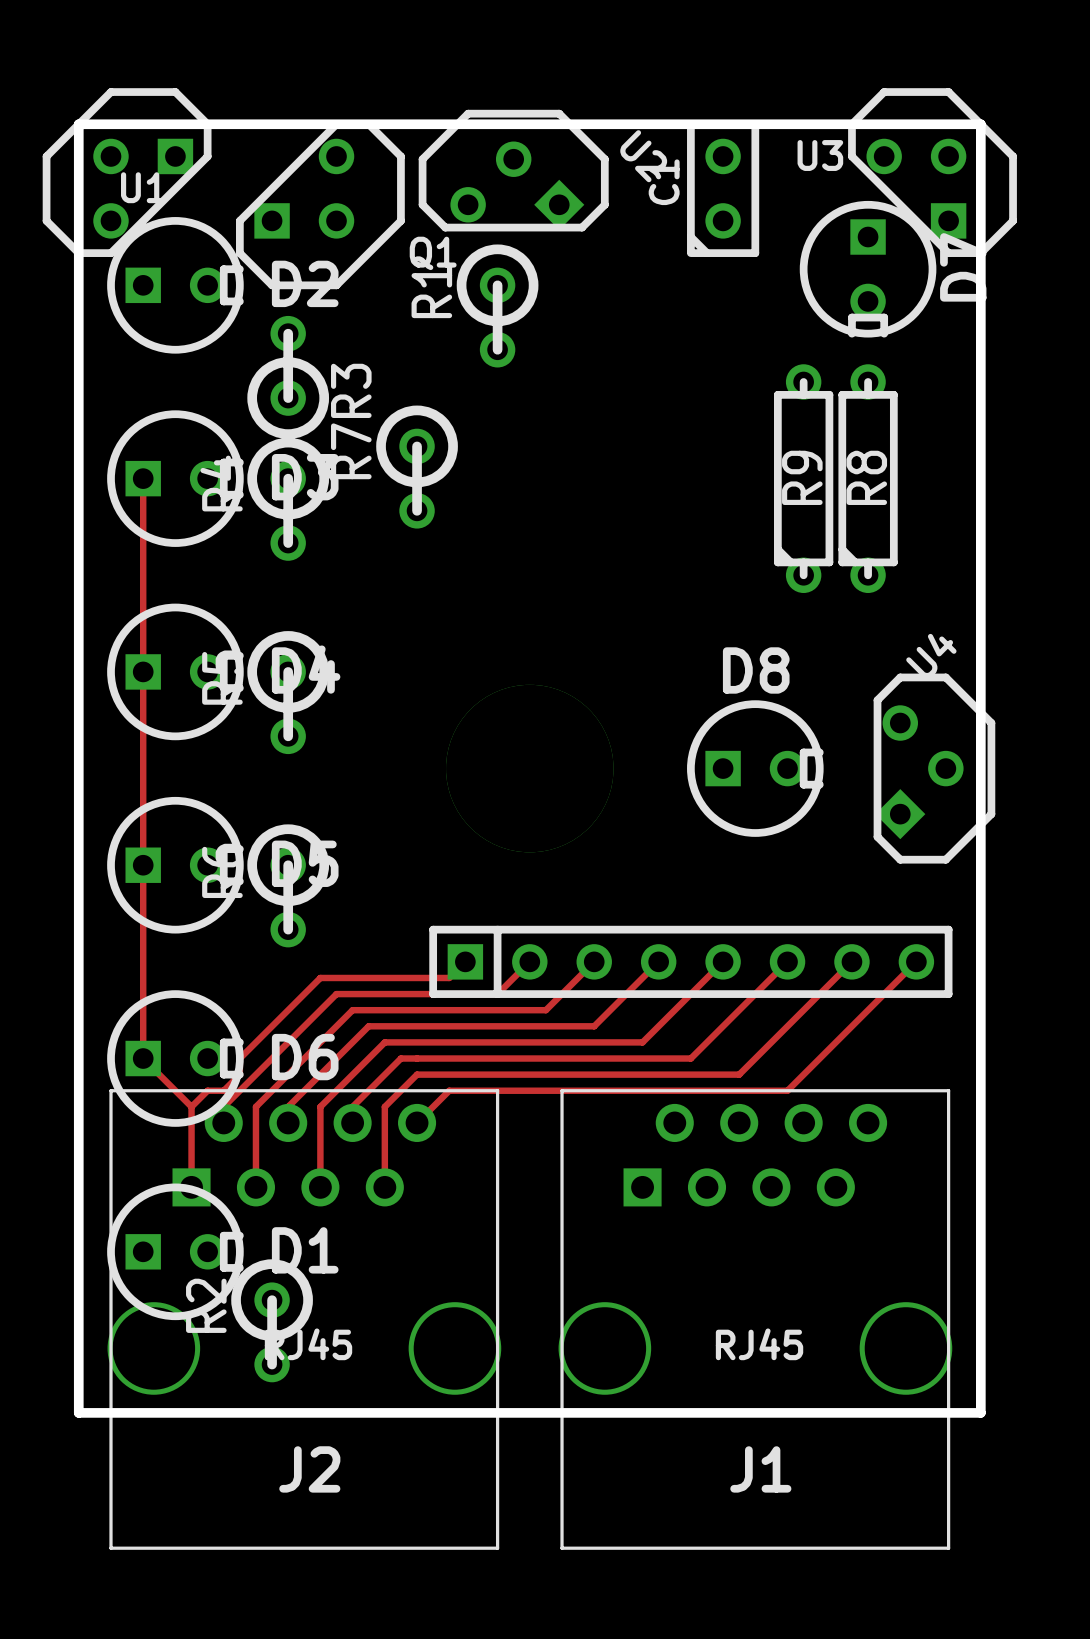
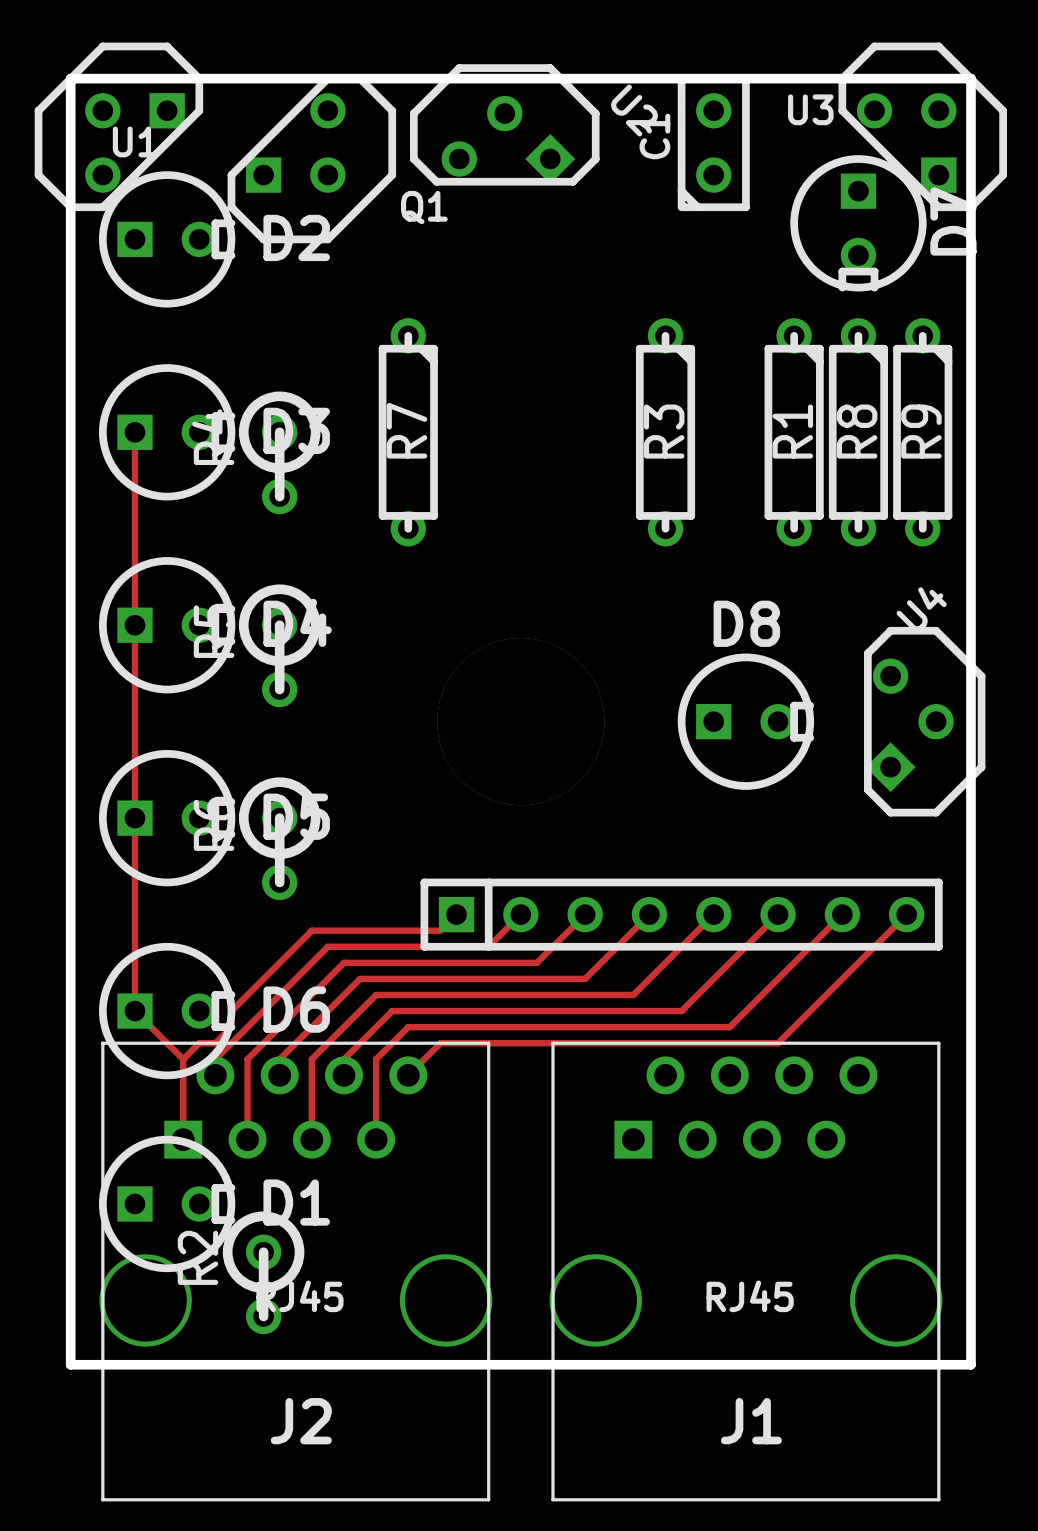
R1 footprint: [456, 244, 539, 368] -> [764, 318, 824, 547]
R1 name position: R1 (431, 291) -> R1 (792, 431)
R3 footprint: [247, 315, 330, 439] -> [635, 318, 696, 547]
R3 name position: R3 (351, 390) -> R3 (664, 431)
R7 footprint: [376, 405, 458, 529] -> [378, 318, 438, 547]
R7 name position: R7 (351, 451) -> R7 (406, 430)
R9 rotation: 0° (803, 478) -> 180° (922, 432)
R8 rotation: 0° (868, 478) -> 180° (858, 432)

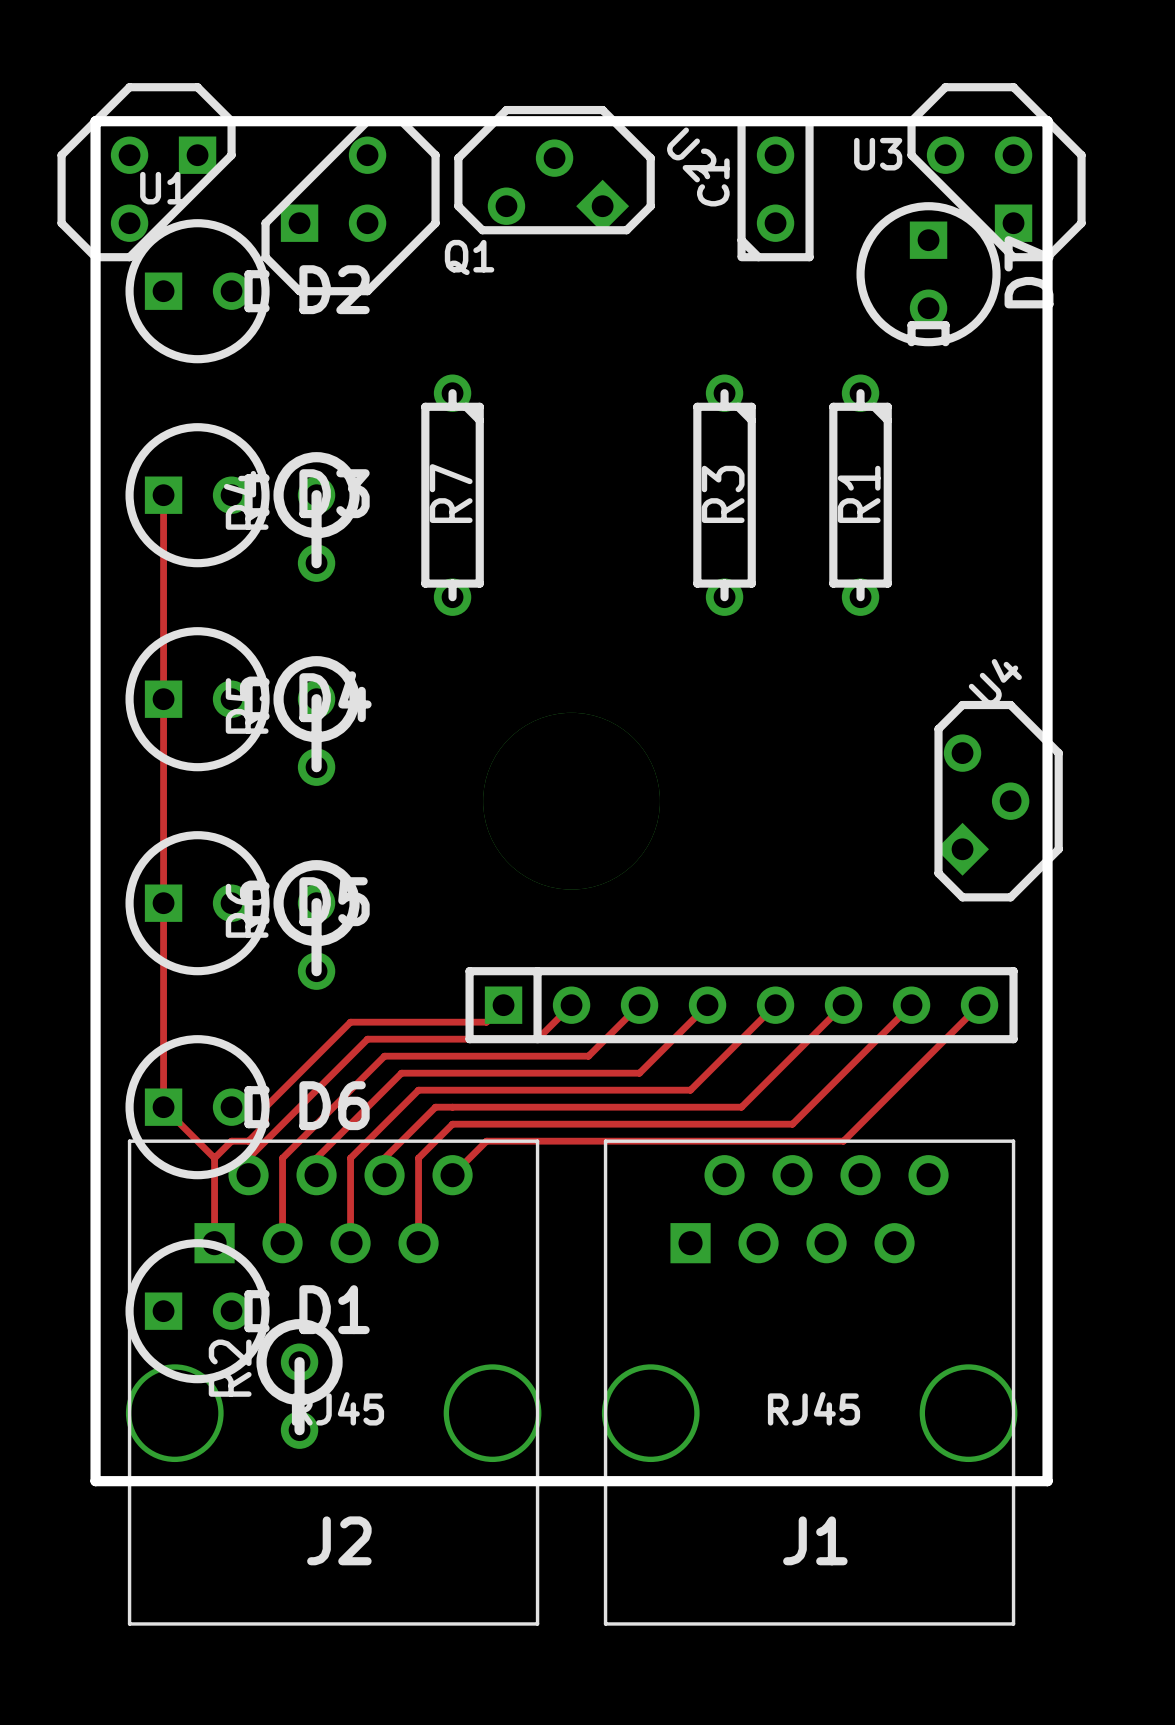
R8: (858, 432) -> none
R9: (922, 432) -> none
D8: (745, 721) -> none

